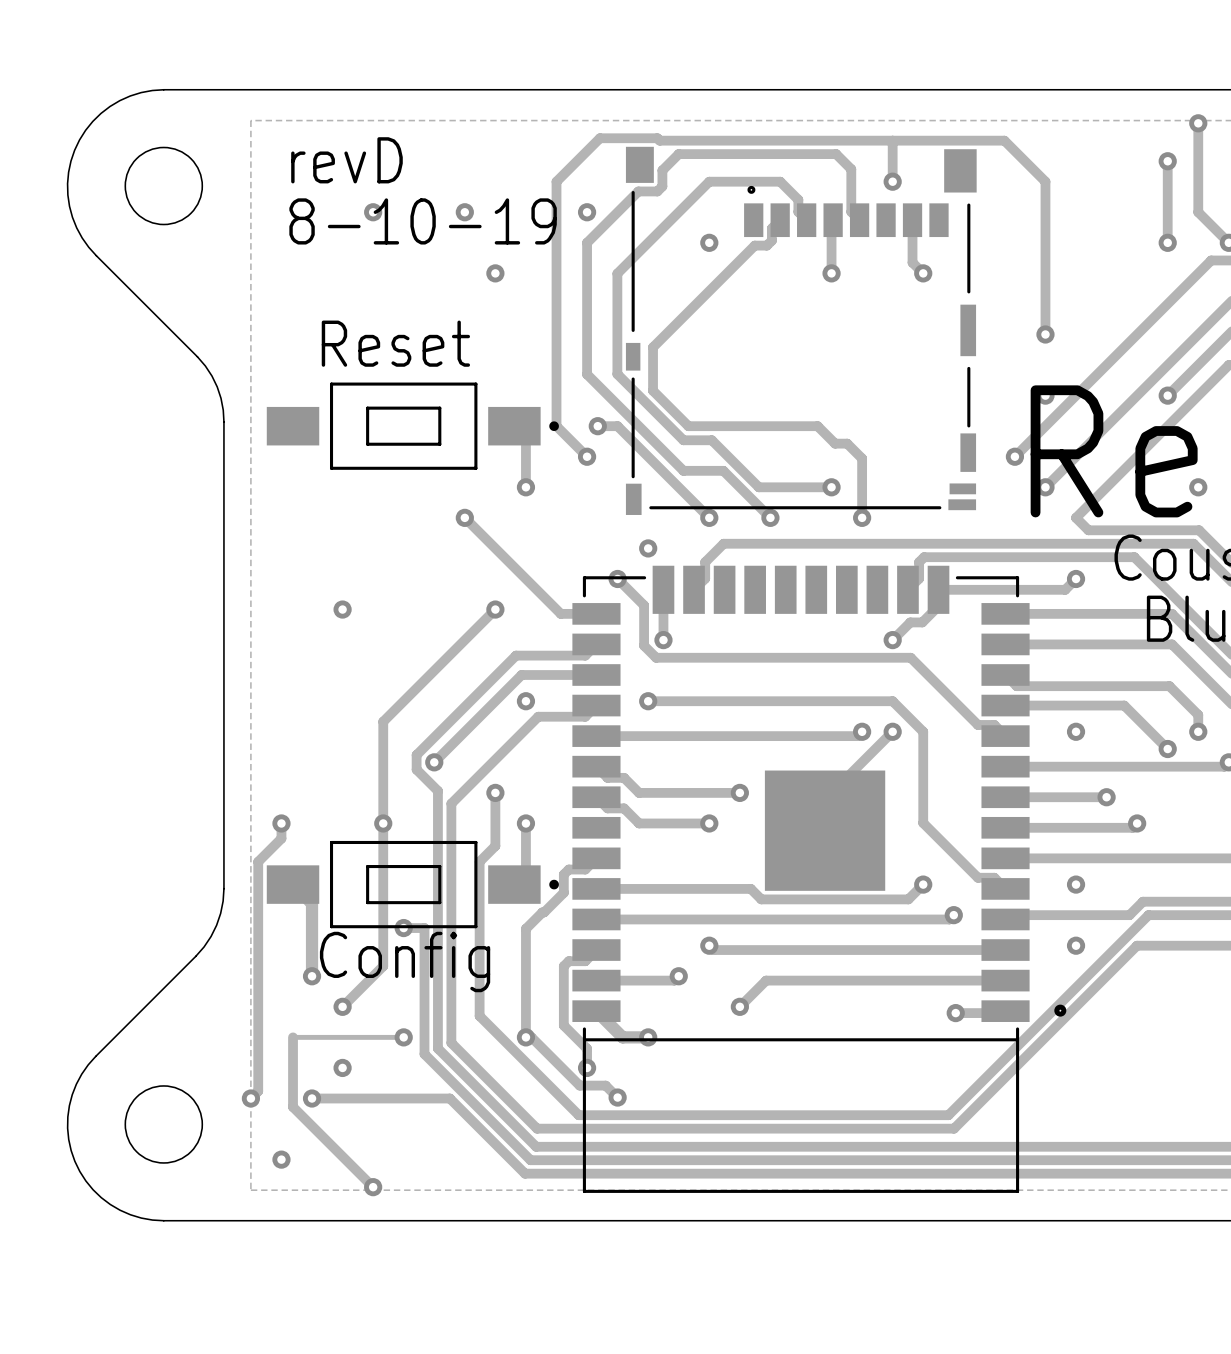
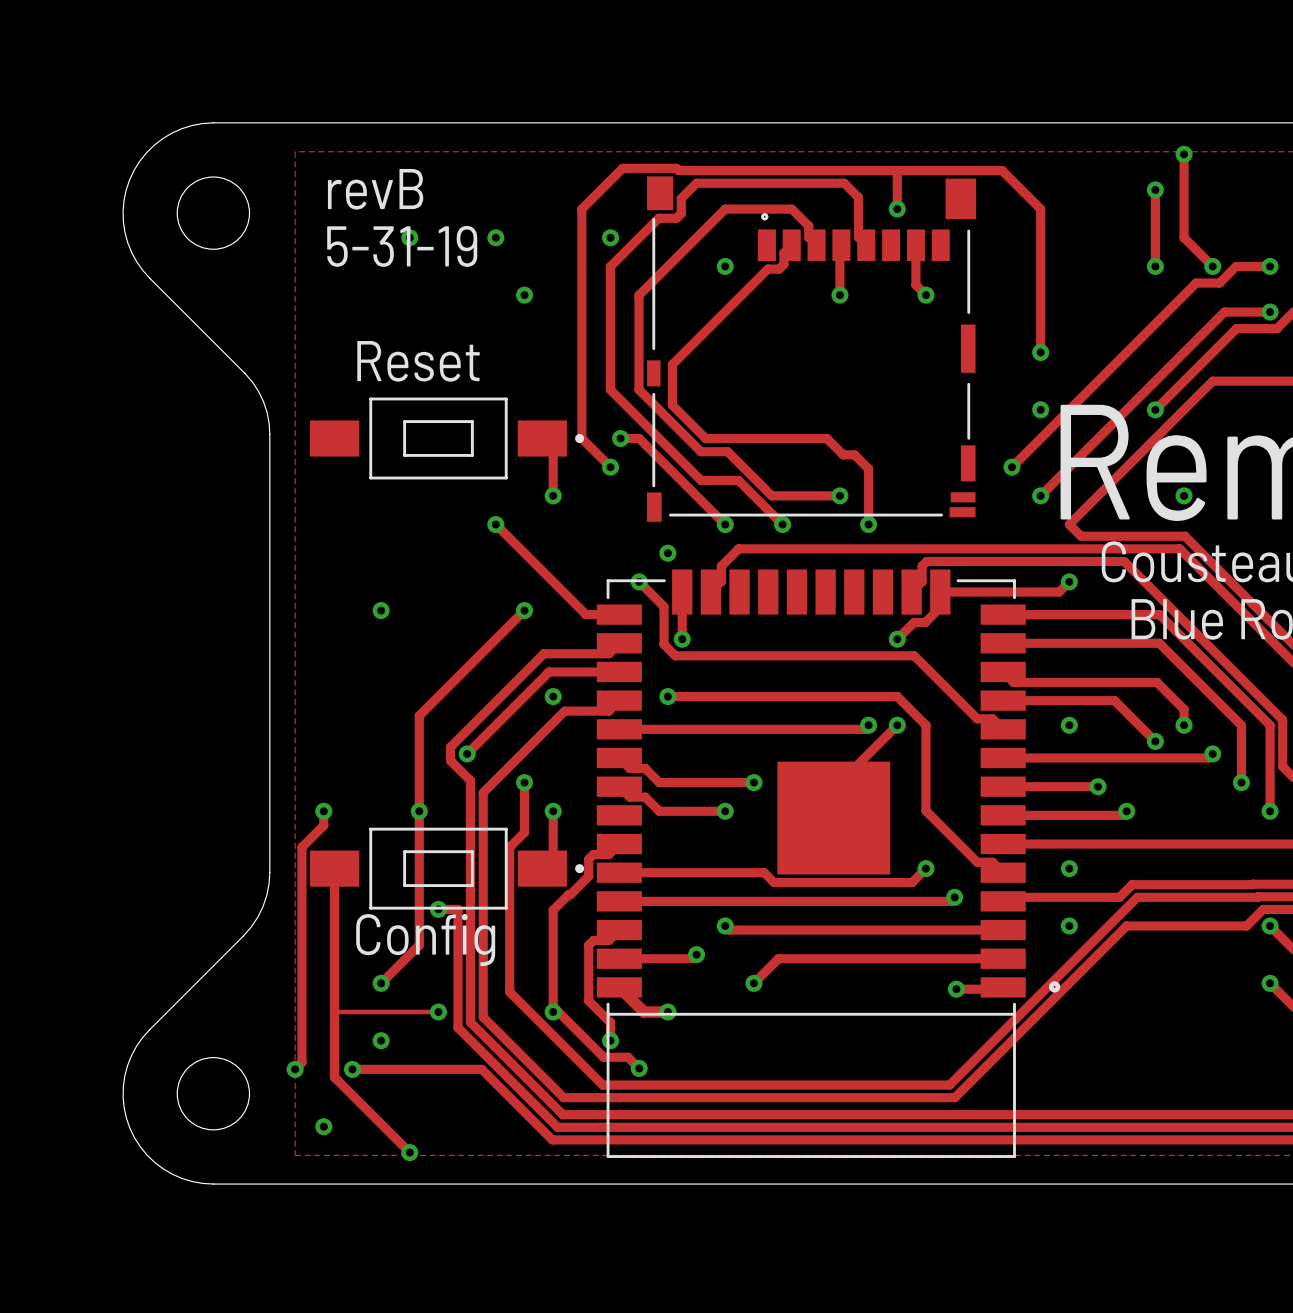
text: revD (346, 160) -> revB (375, 189)
text: 8-10-19 (423, 221) -> 5-31-19 (402, 246)
track: (293, 884) (312, 903) (312, 976) -> (334, 868) (334, 1012)
via: (312, 976) -> none

